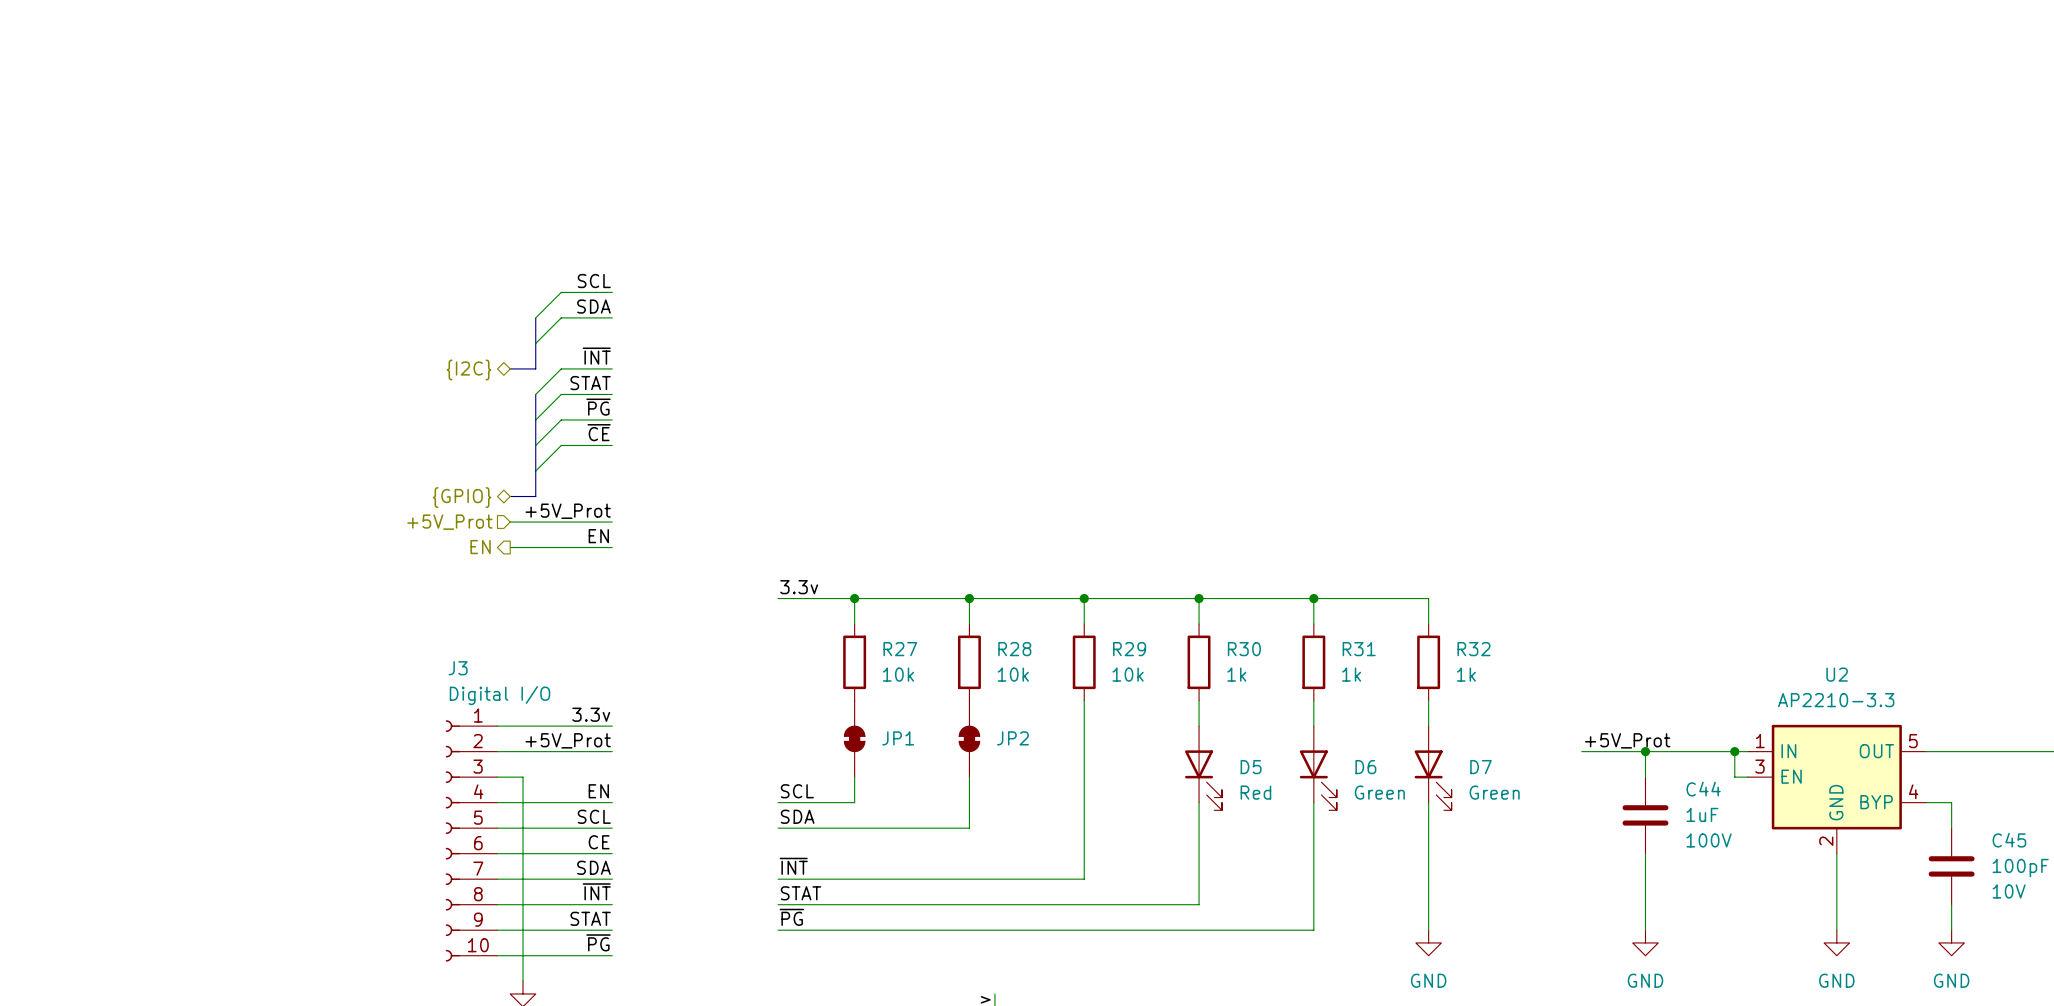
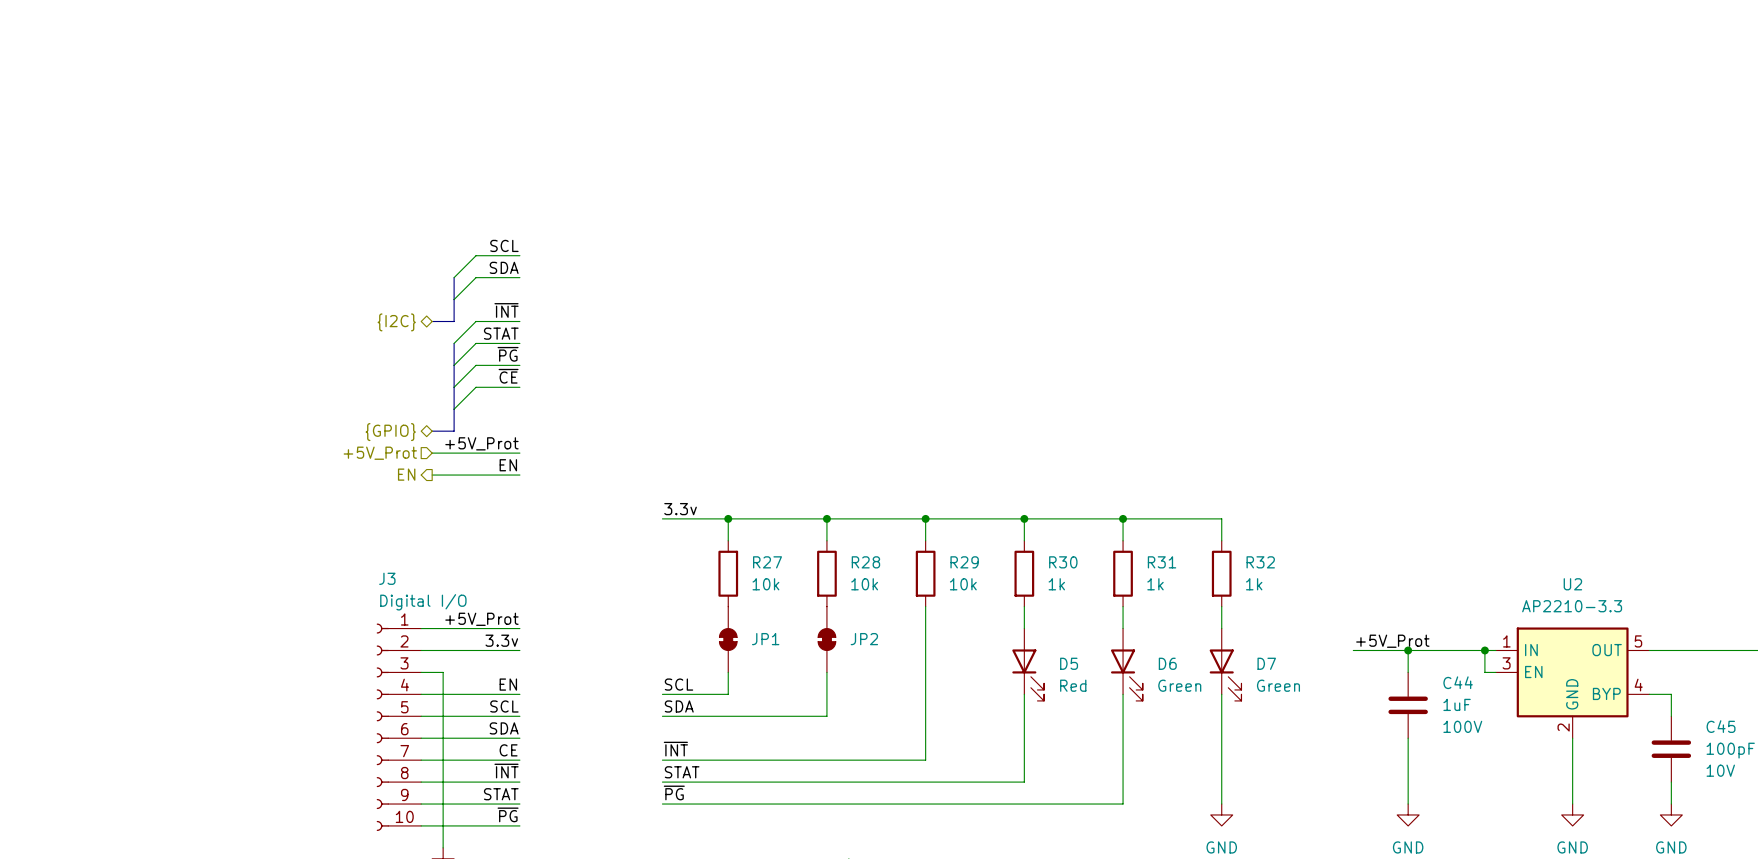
label: 3.3v (591, 714) -> +5V_Prot (481, 619)
label: +5V_Prot (568, 740) -> 3.3v (501, 640)
label: CE (599, 842) -> SDA (504, 728)
label: SDA (593, 867) -> CE (508, 750)

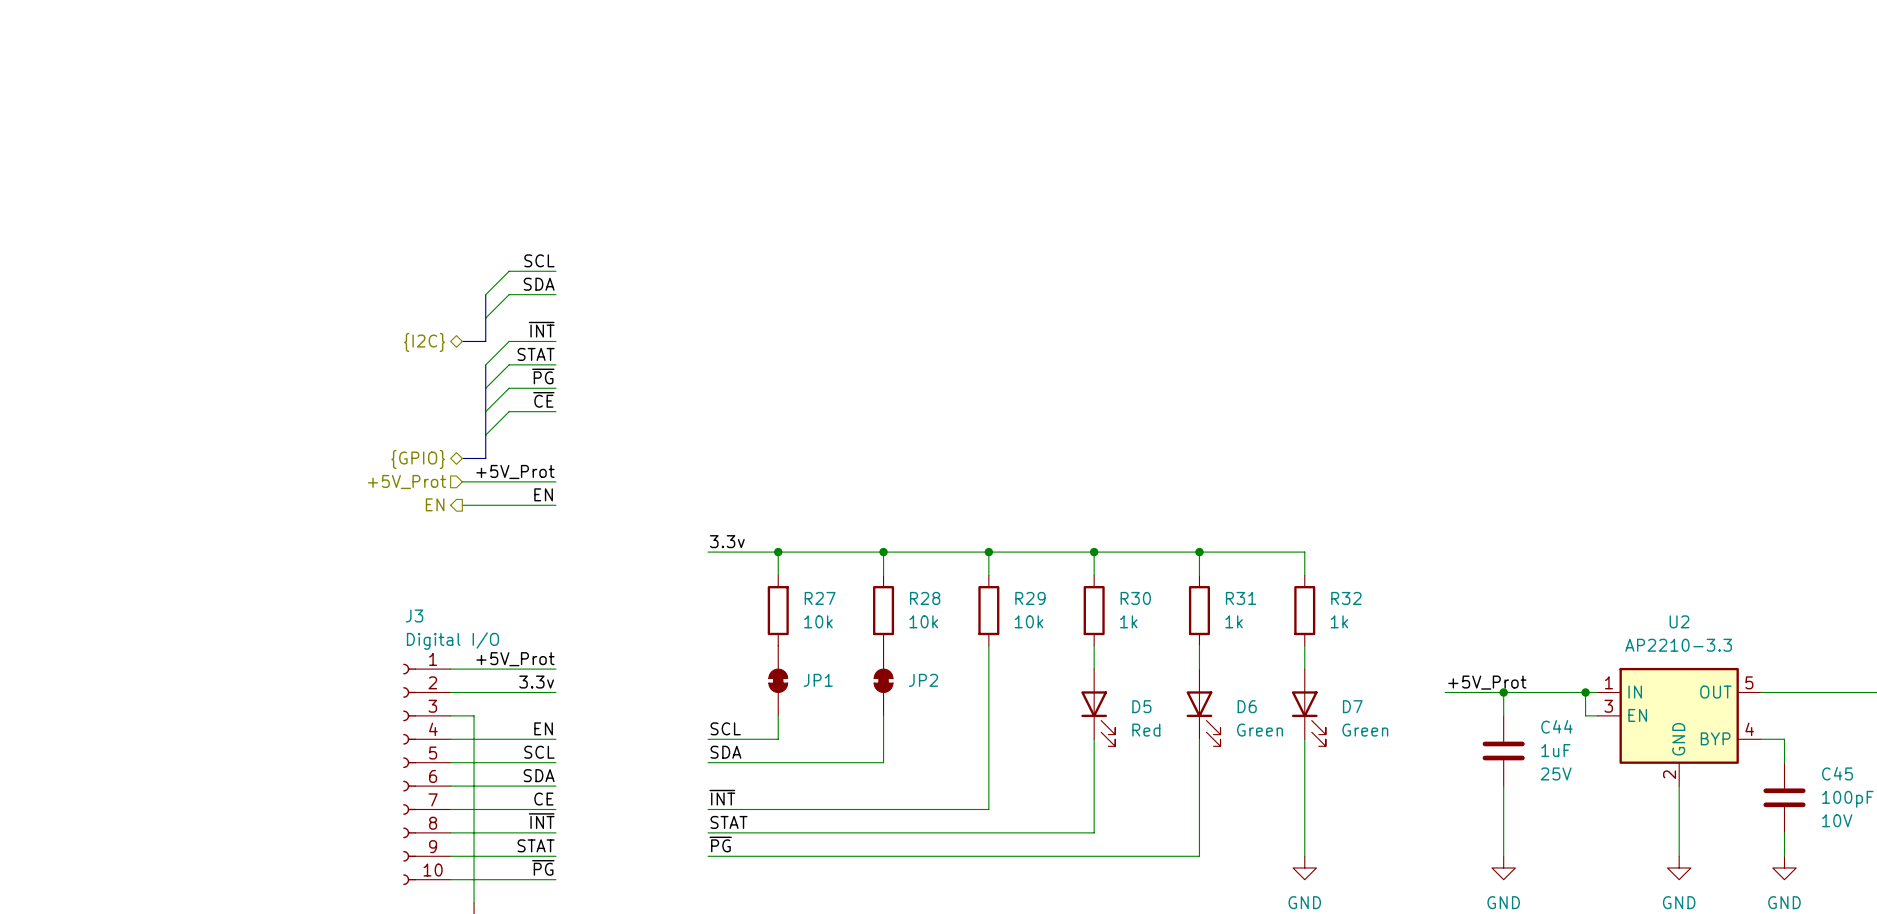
C44 text: 100V (1462, 726) -> 25V (1556, 773)

